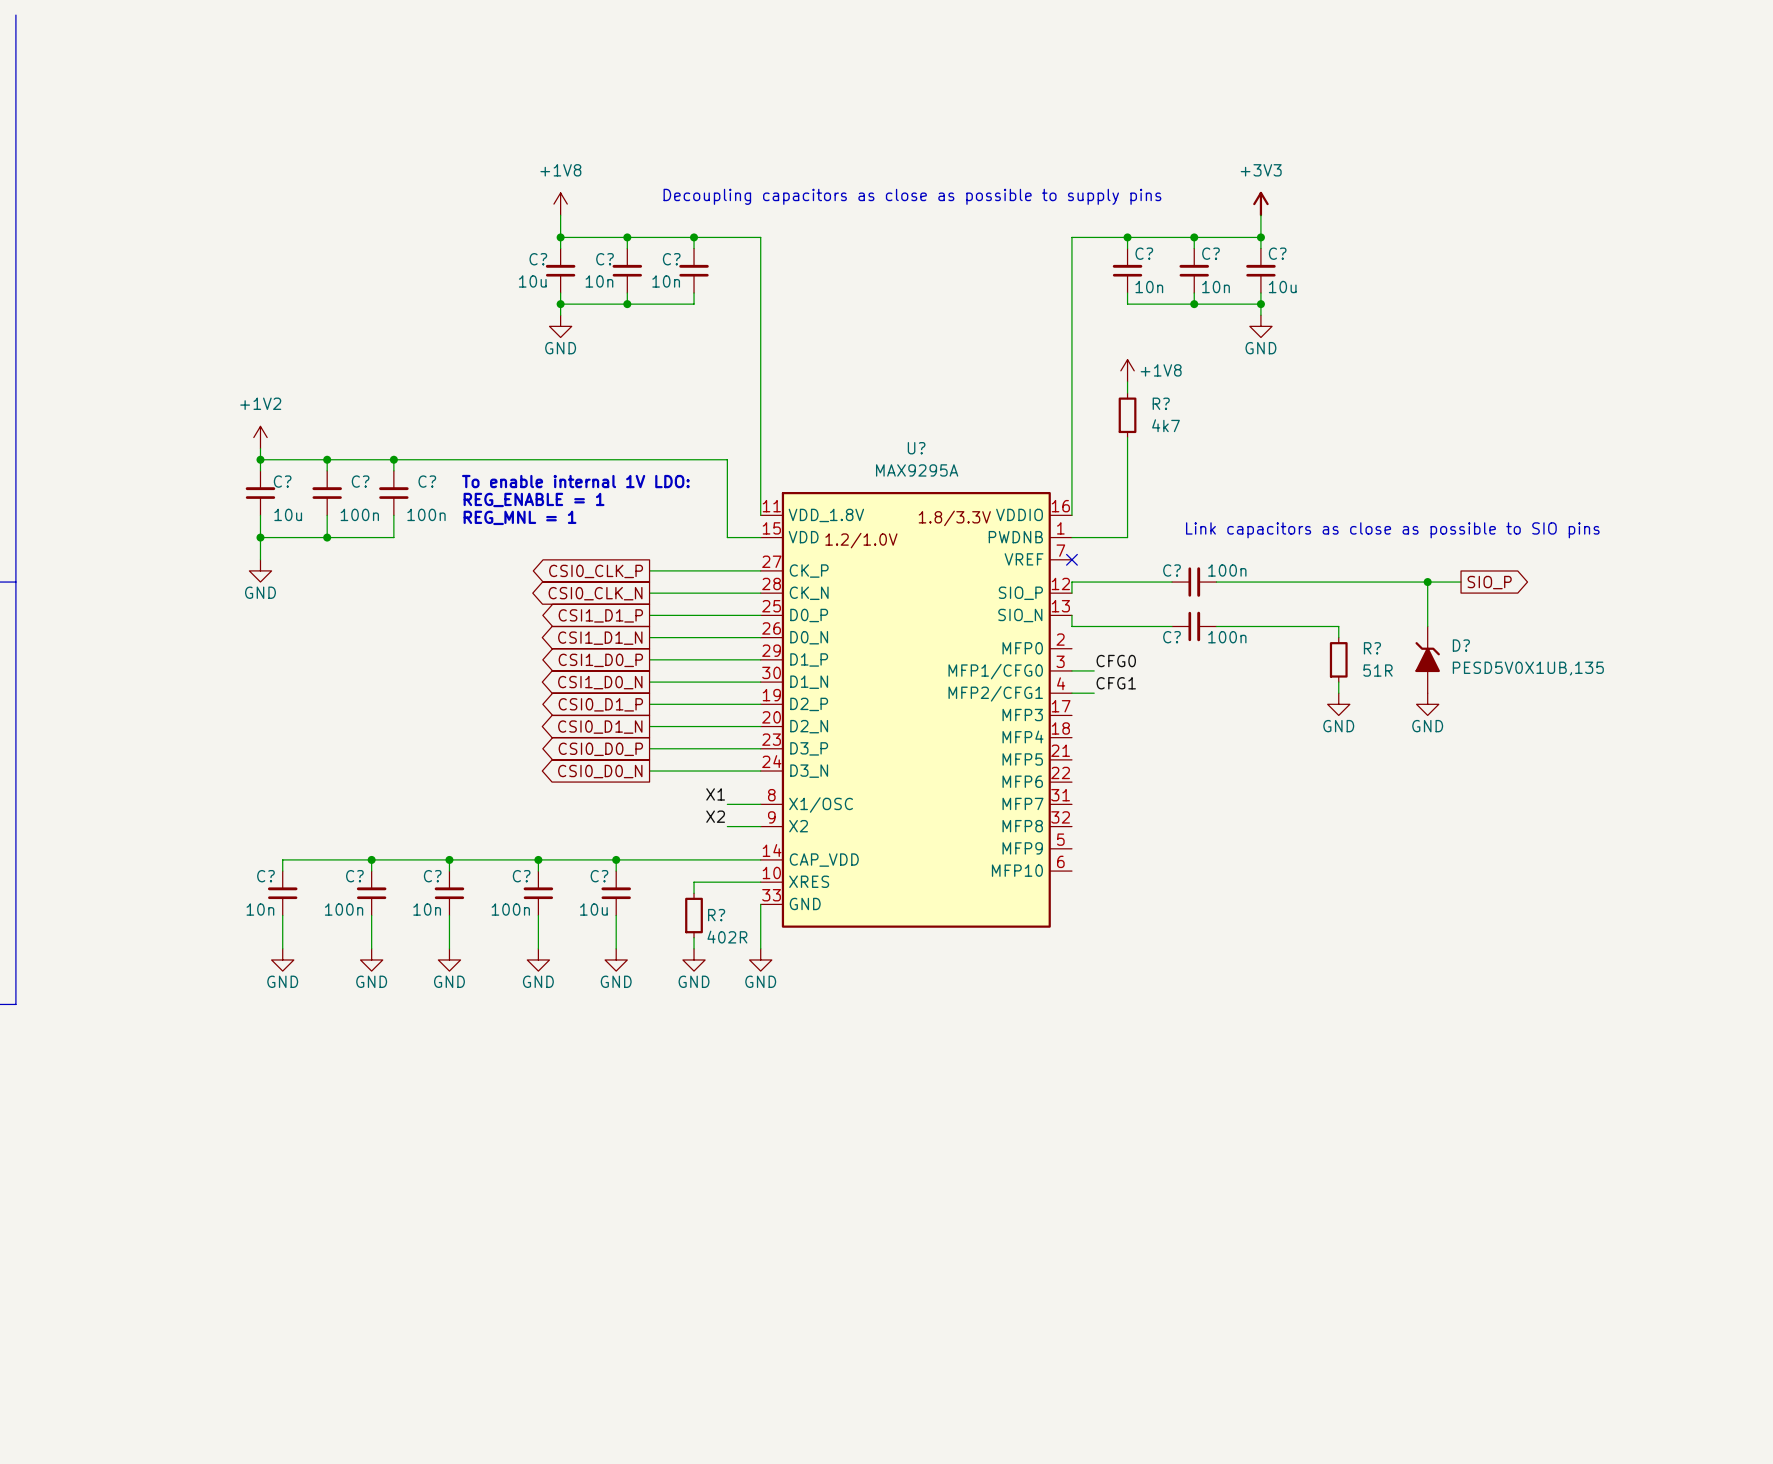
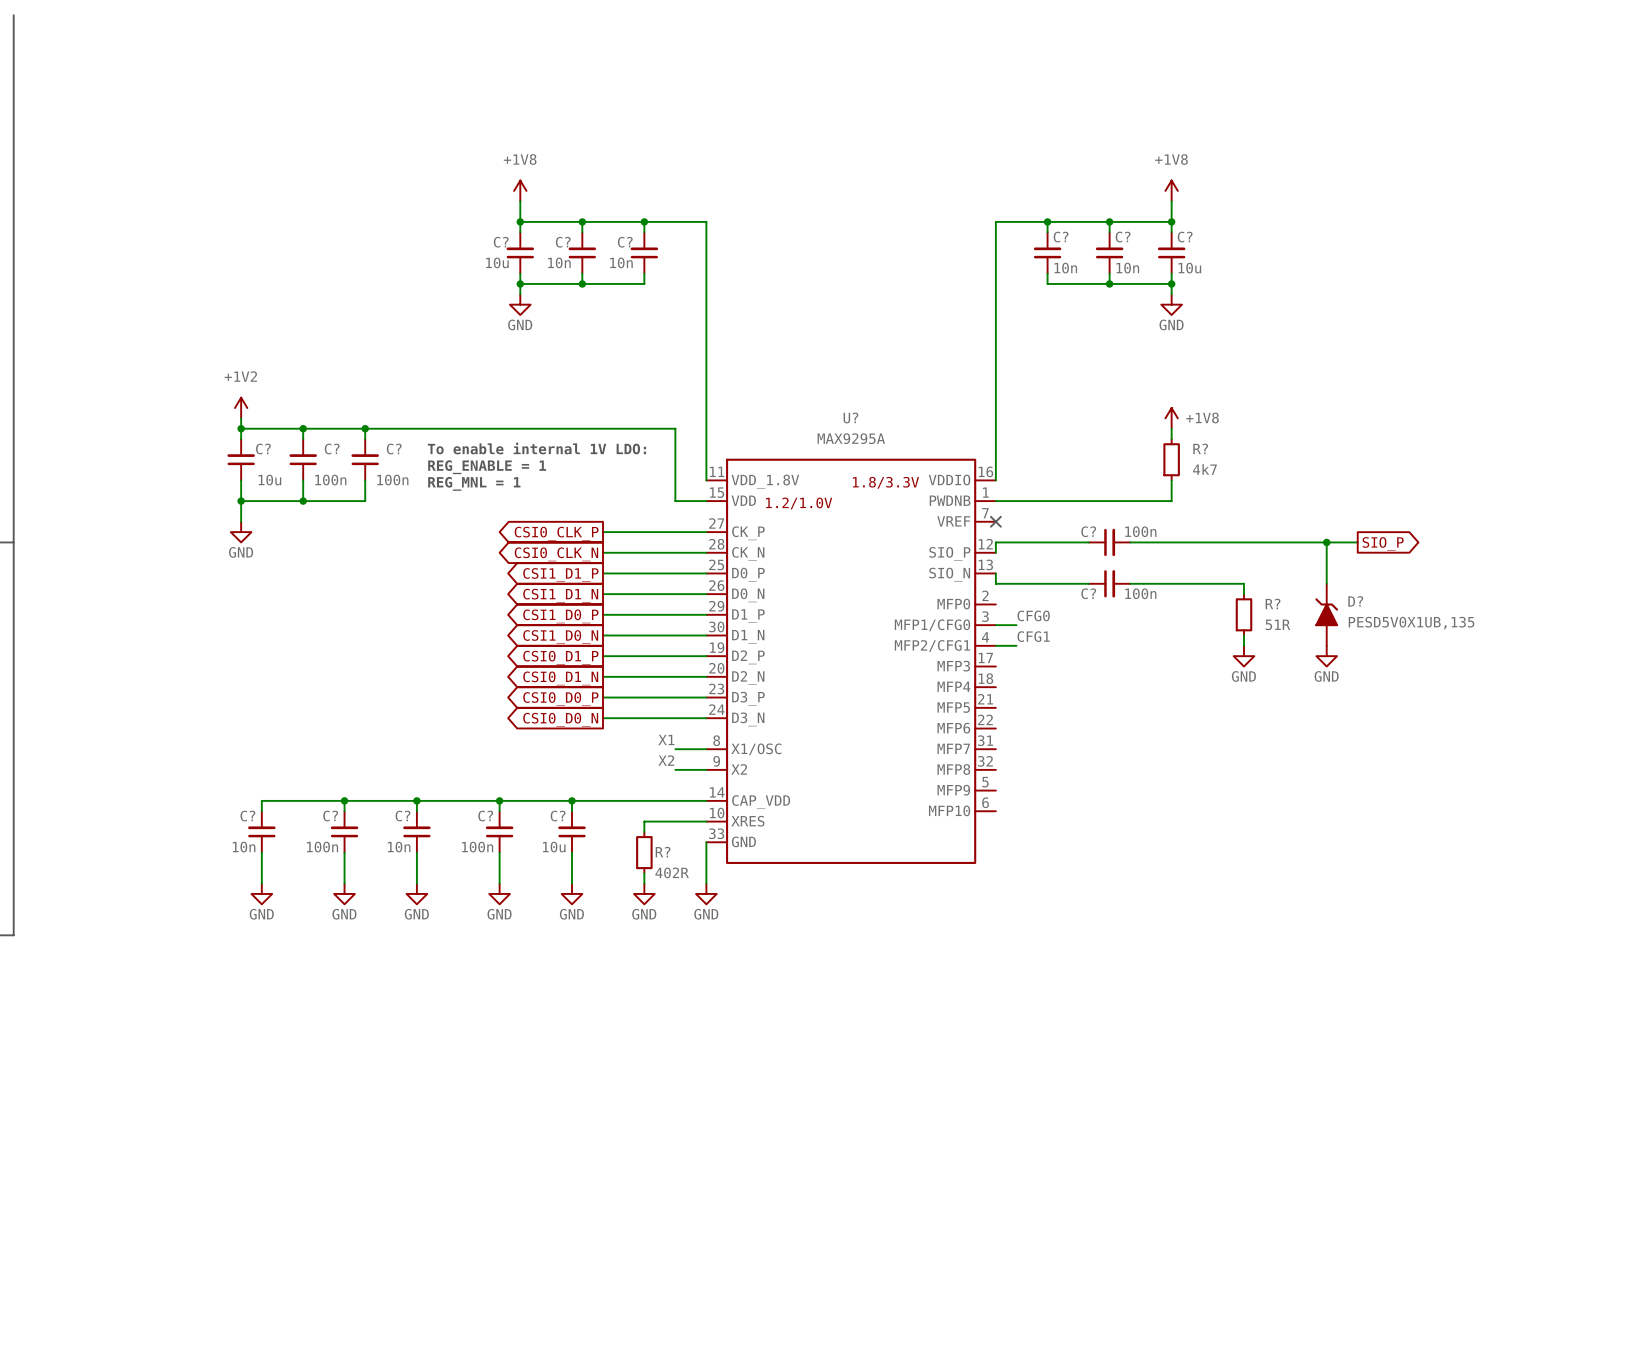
text: Decoupling capacitors as close as possible to supply pins (912, 196) -> none
power symbol: +3V3 (1260, 204) -> +1V8 (1171, 190)
power symbol position: +1V8 (1127, 370) -> +1V8 (1171, 418)
wire: (1127, 381) (1127, 393) -> (1171, 428) (1171, 439)
R? position: (1127, 415) -> (1171, 459)
wire: (1127, 437) (1127, 537) -> (1171, 480) (1171, 501) (1047, 501)
text: Link capacitors as close as possible to SIO pins (1392, 530) -> none

